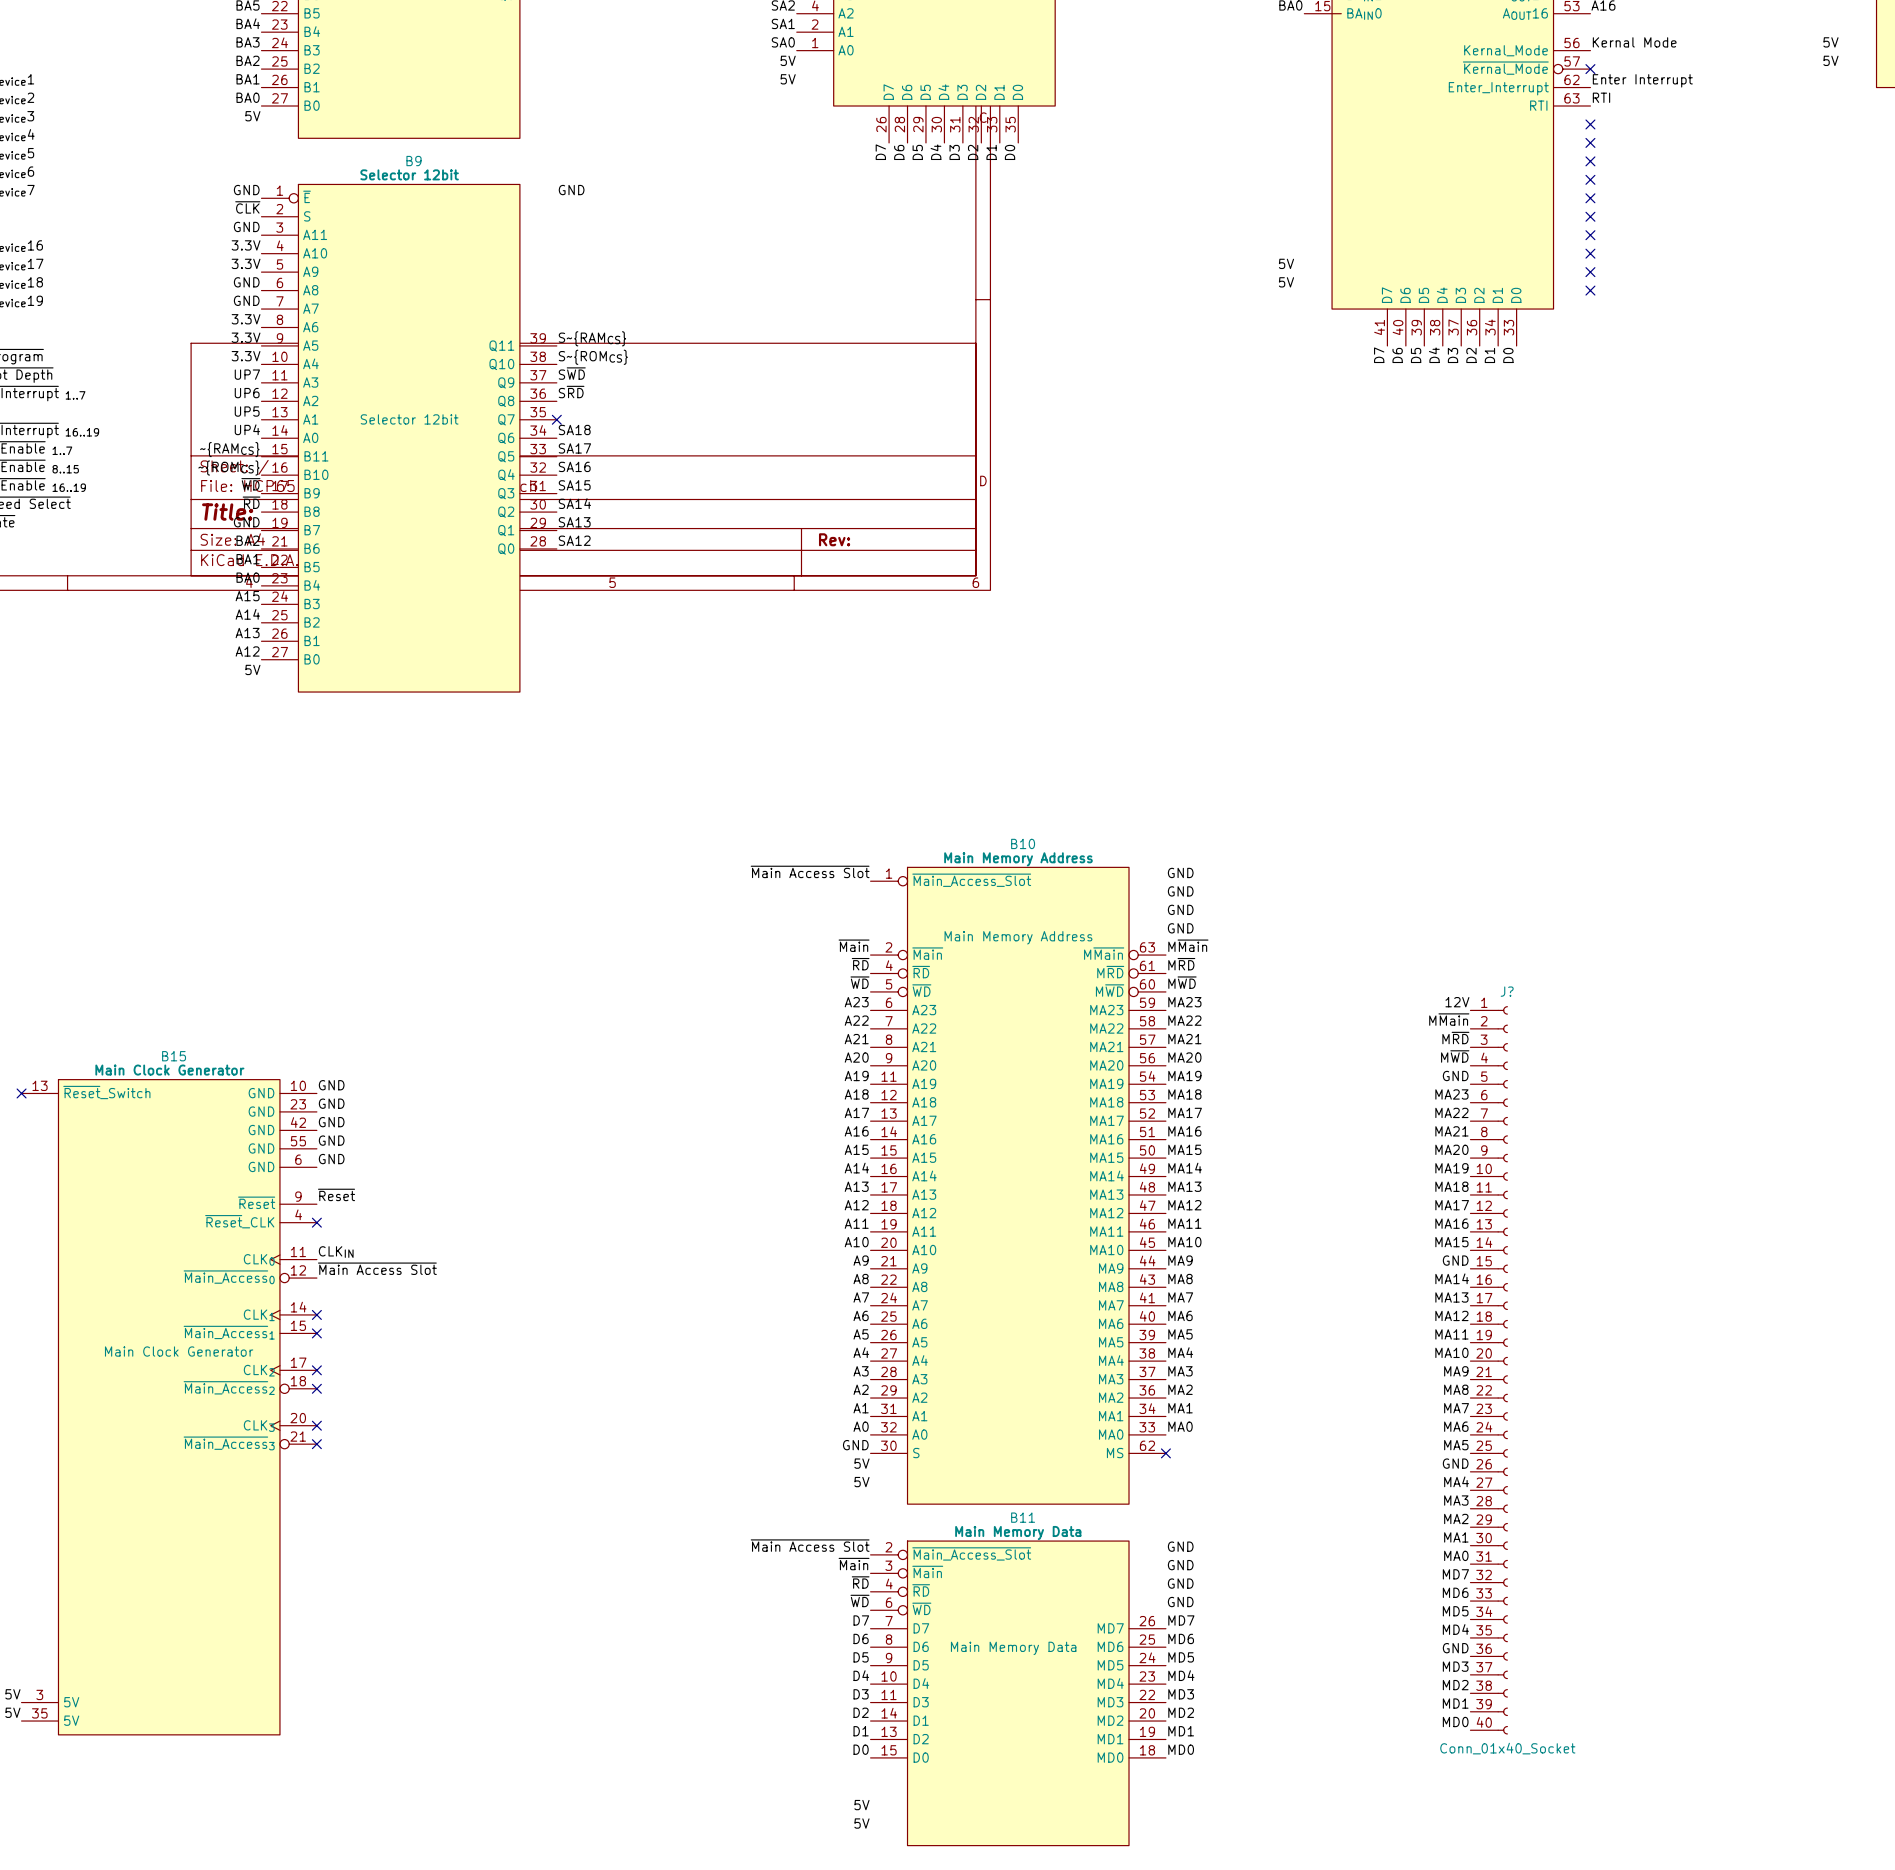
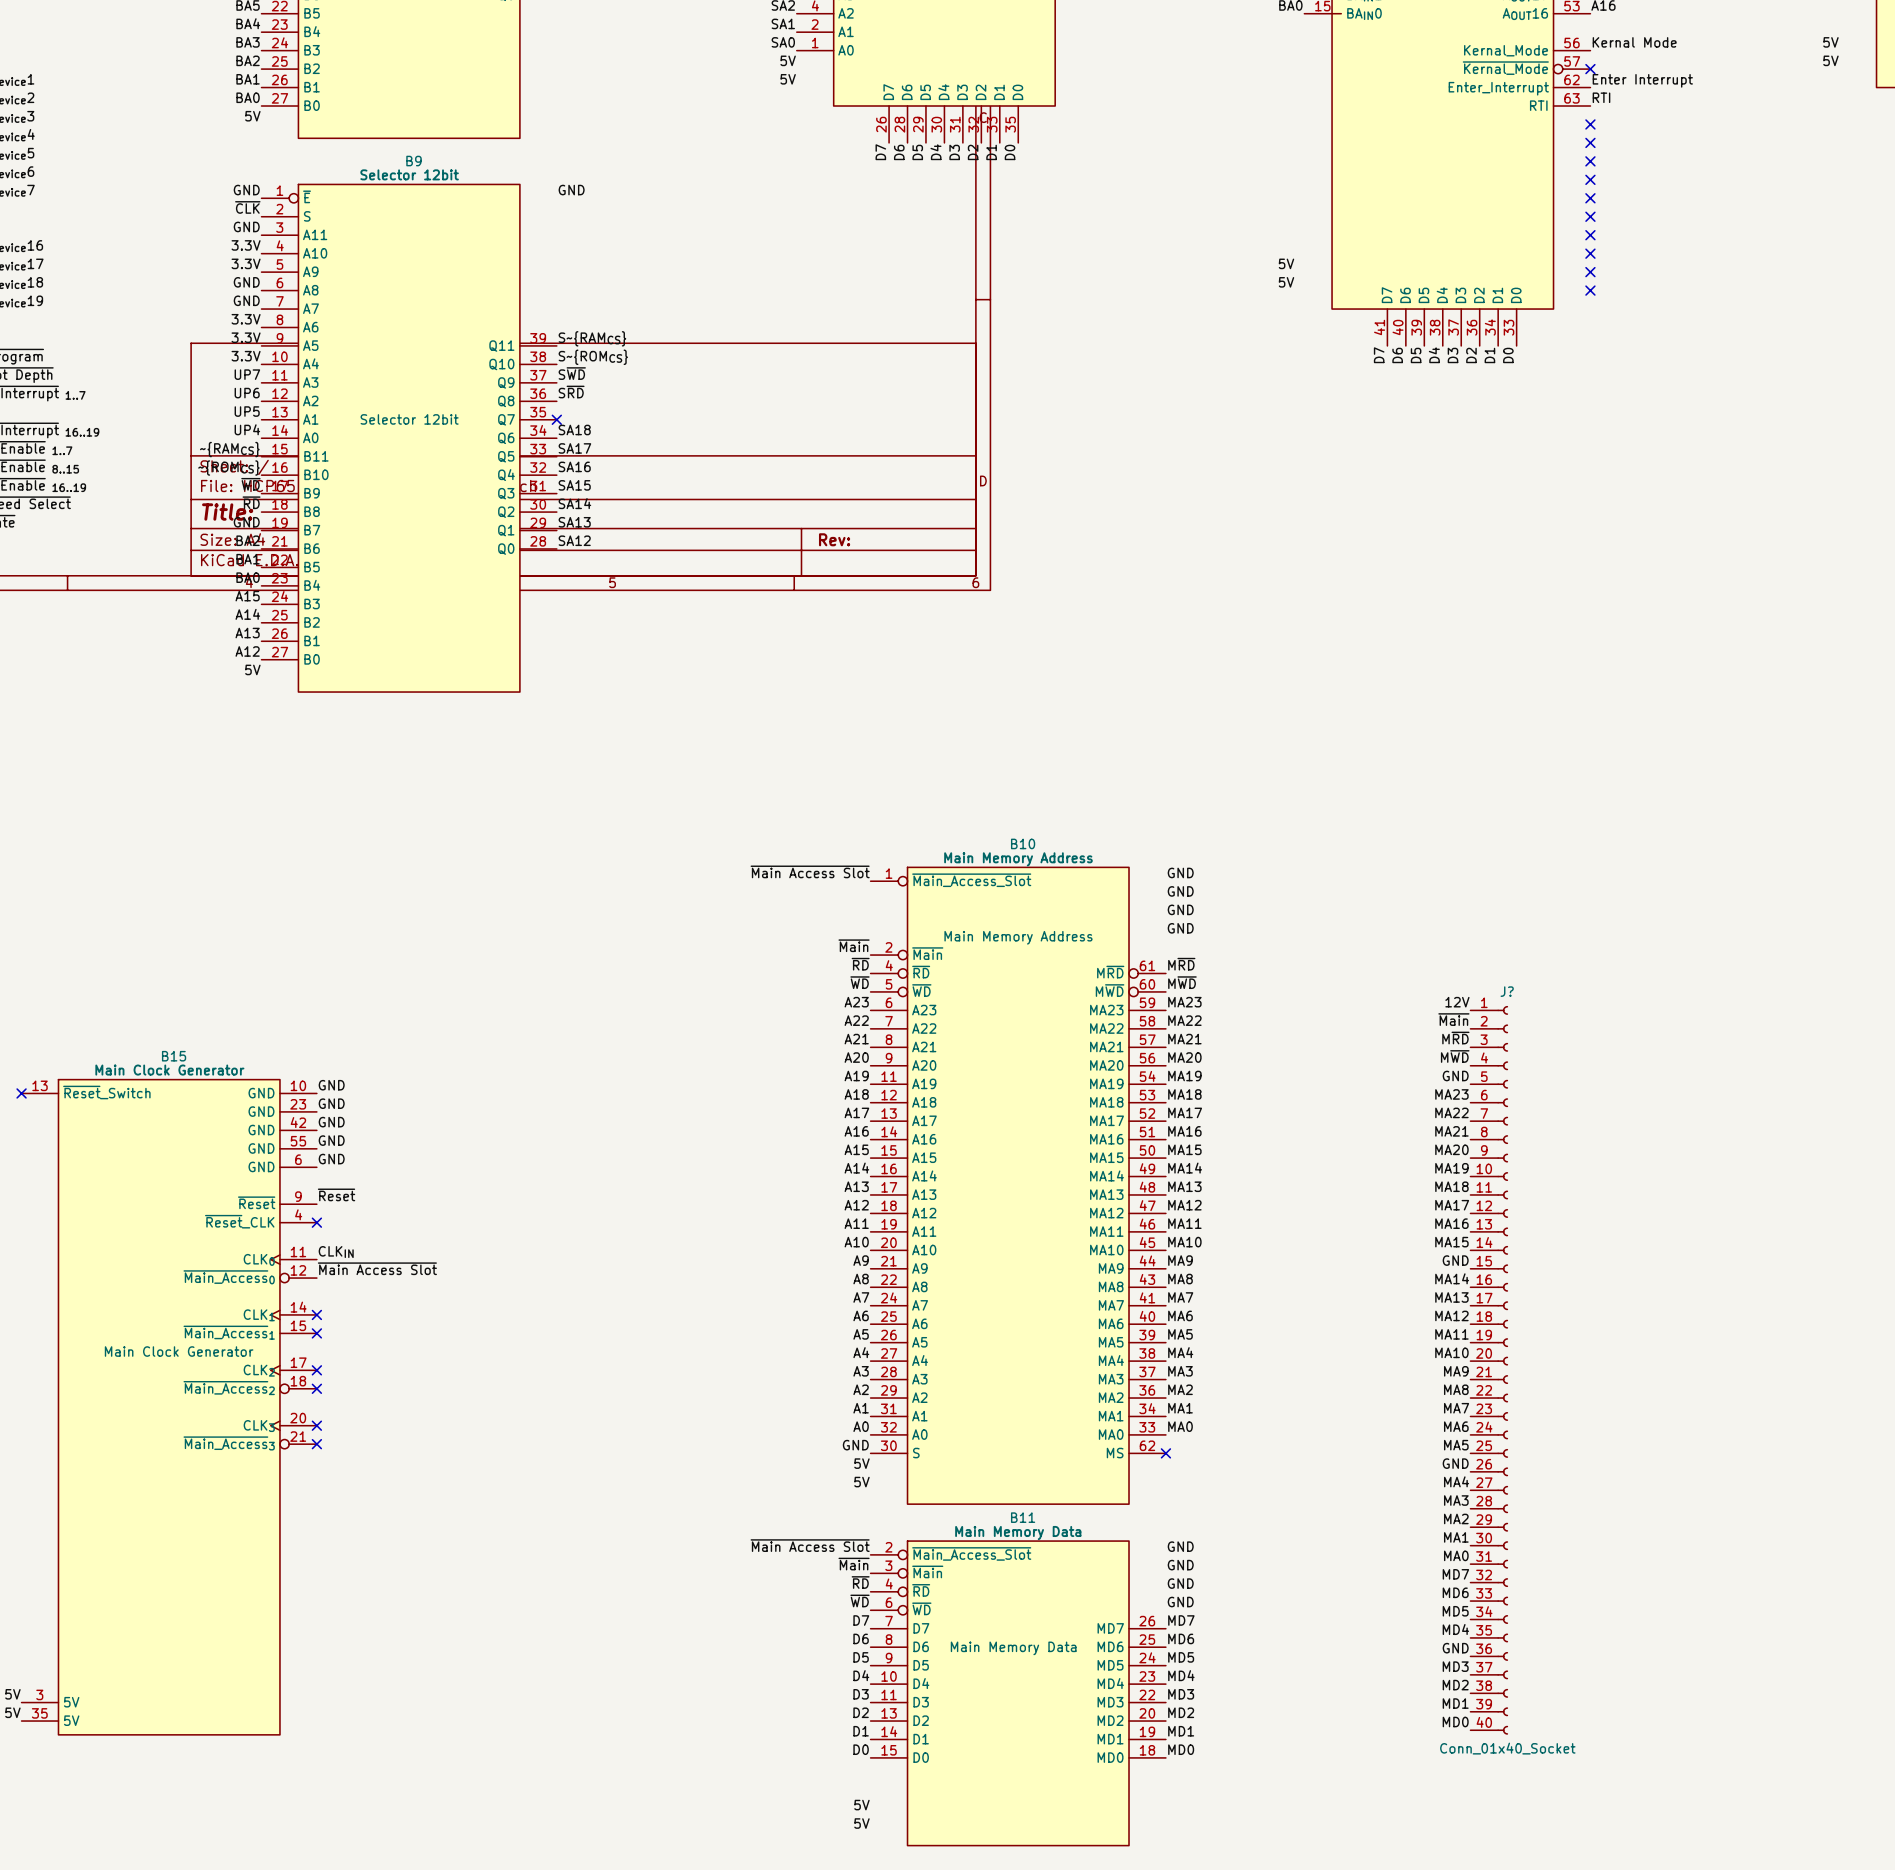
B10 symbol: [870, 866, 1166, 1505] -> [870, 866, 1166, 1505]
label: M~{Main} (1188, 945) -> none
label: M~{Main} (1449, 1019) -> ~{Main} (1453, 1019)
B11 pin number: 14 (889, 1713) -> 13 (889, 1713)
B11 pin name: D1 (921, 1720) -> D2 (921, 1720)
B11 pin number: 13 (889, 1731) -> 14 (889, 1731)
B11 pin name: D2 (921, 1739) -> D1 (921, 1739)

